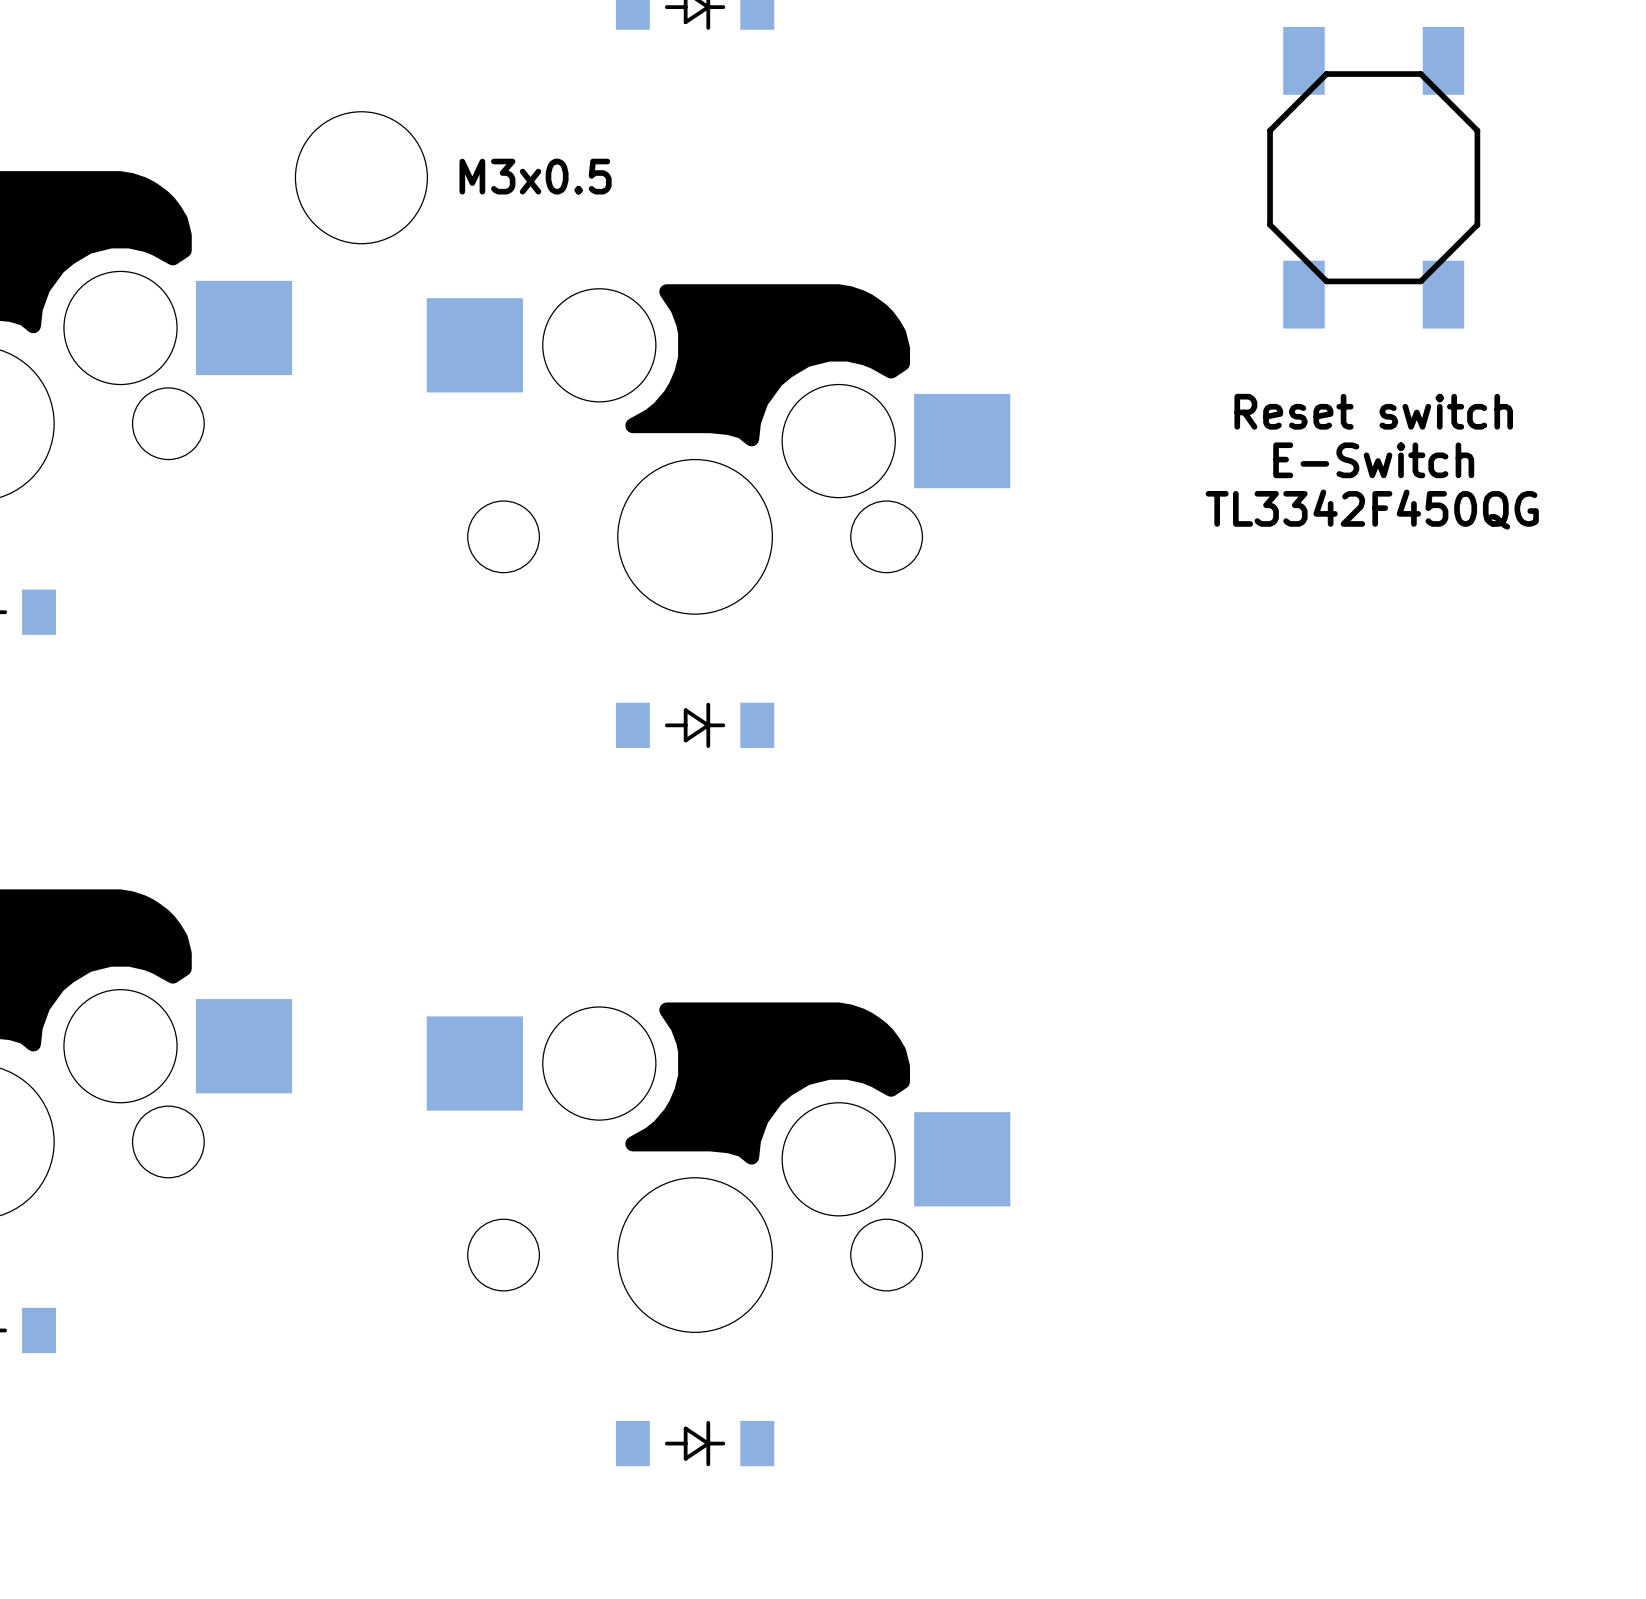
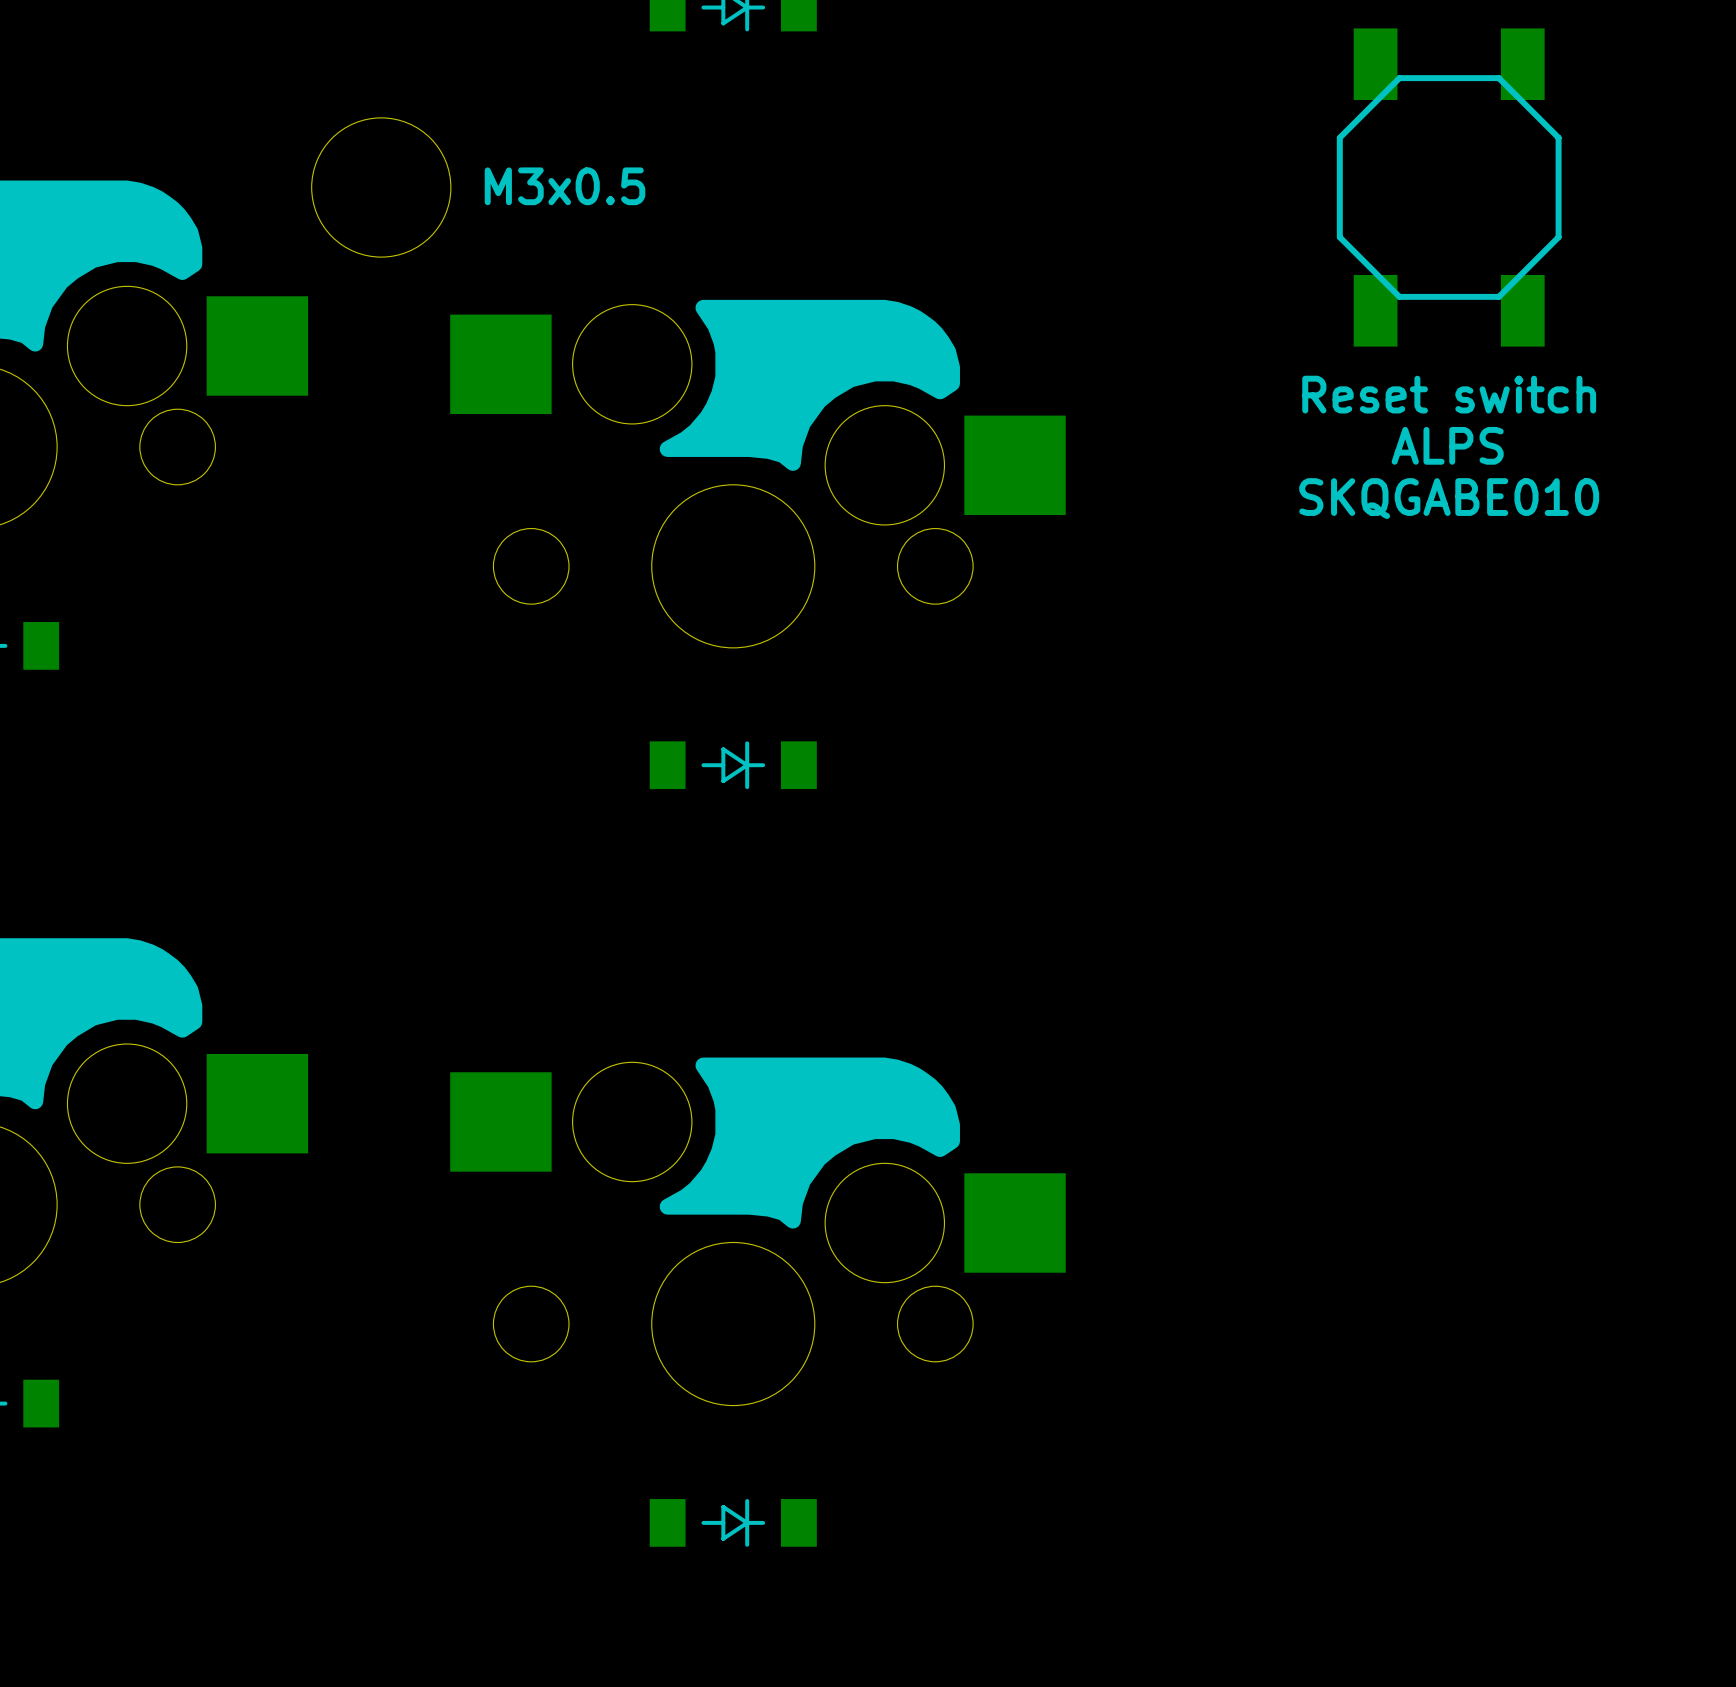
text position: Reset switch (1373, 411) -> Reset switch (1449, 394)
text: none -> ALPS (1447, 445)
text: E-Switch (1373, 460) -> SKQGABE010 (1449, 498)
text: TL3342F450QG (1372, 509) -> none

